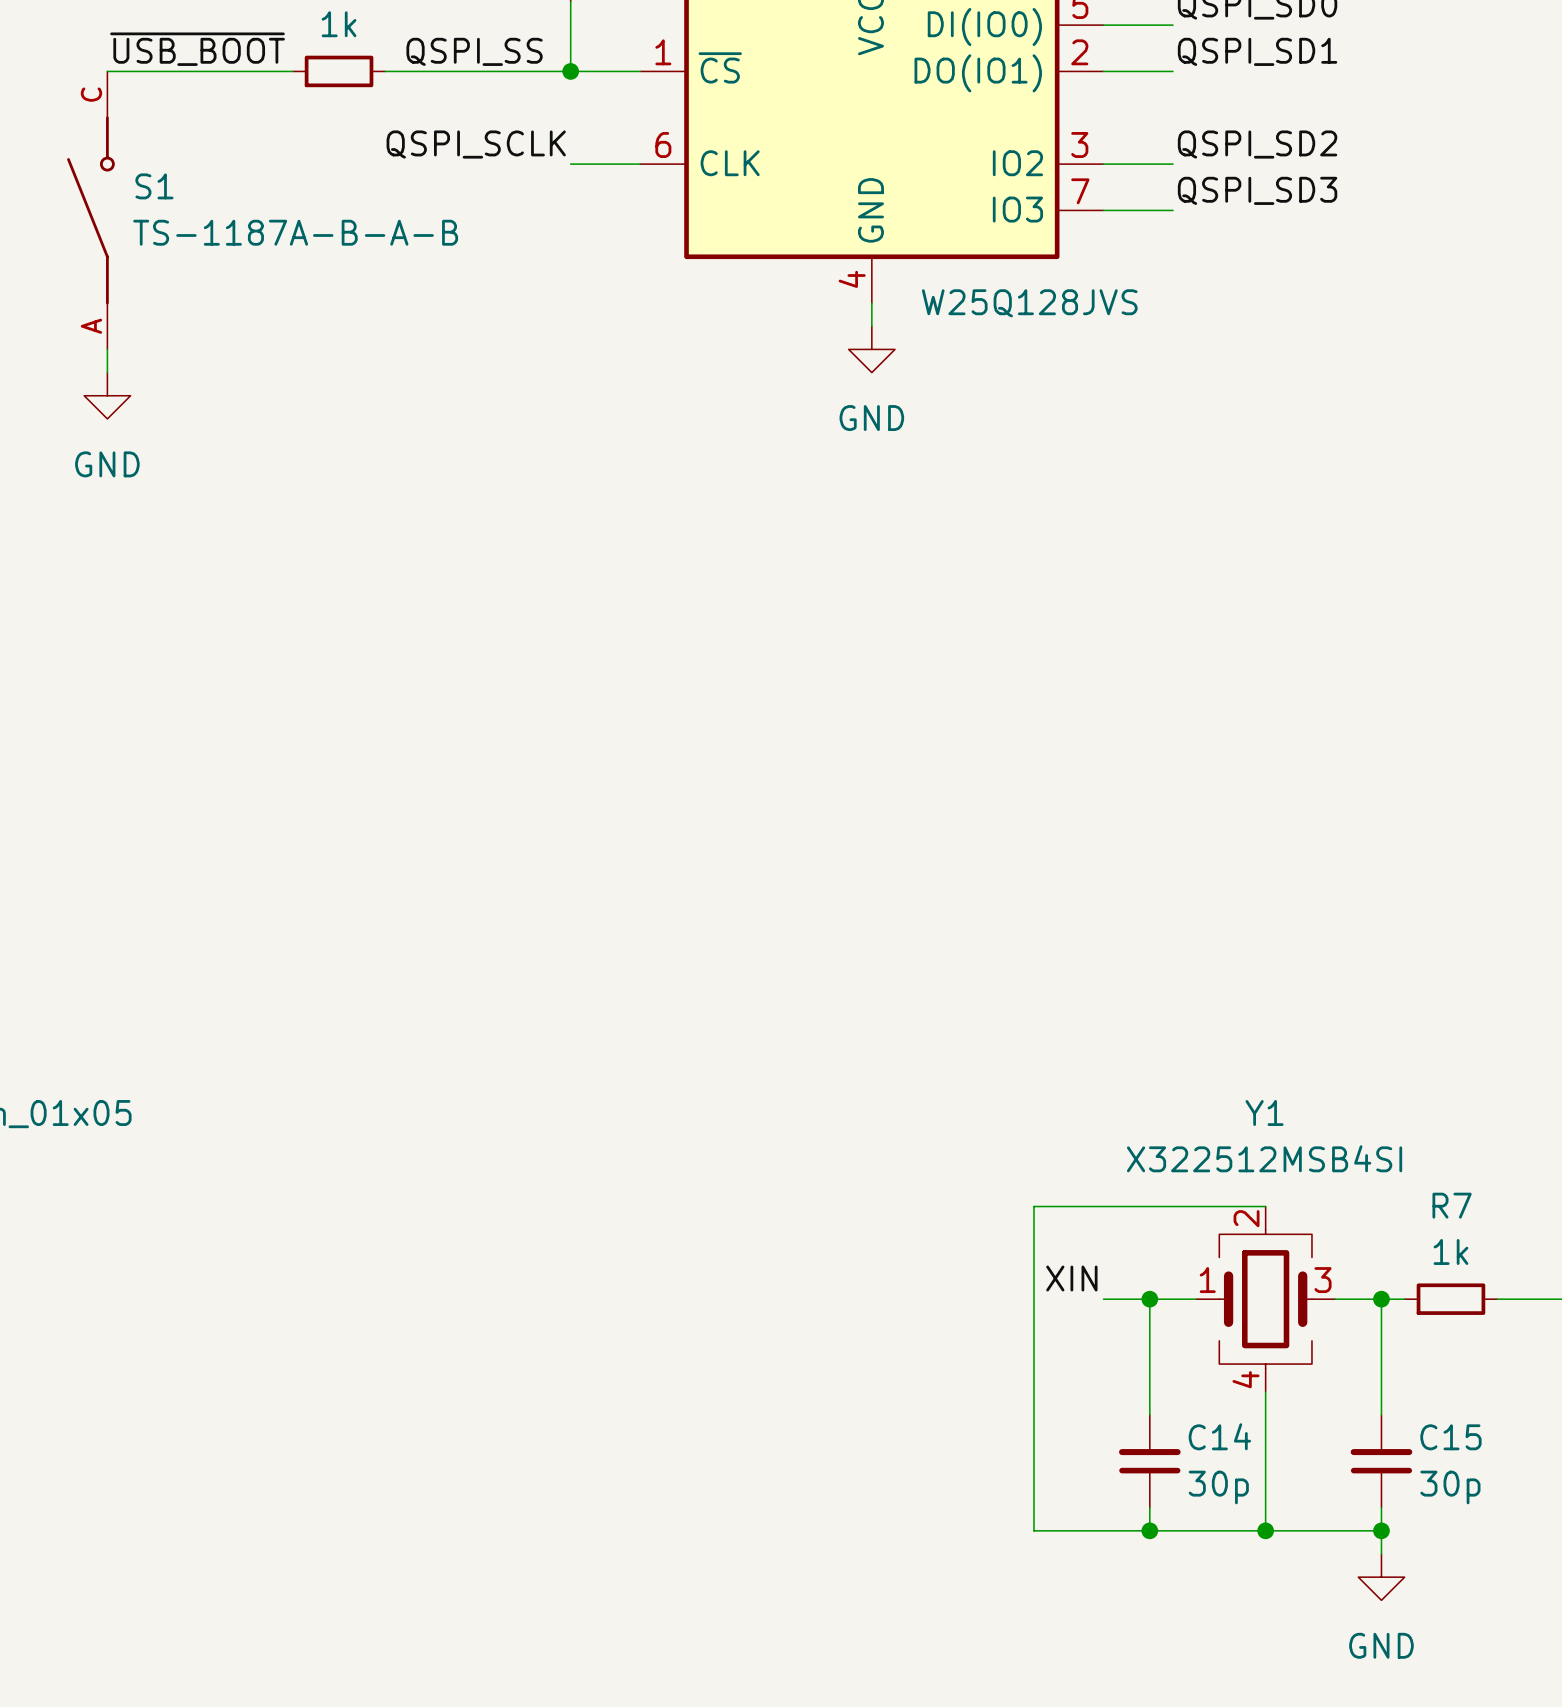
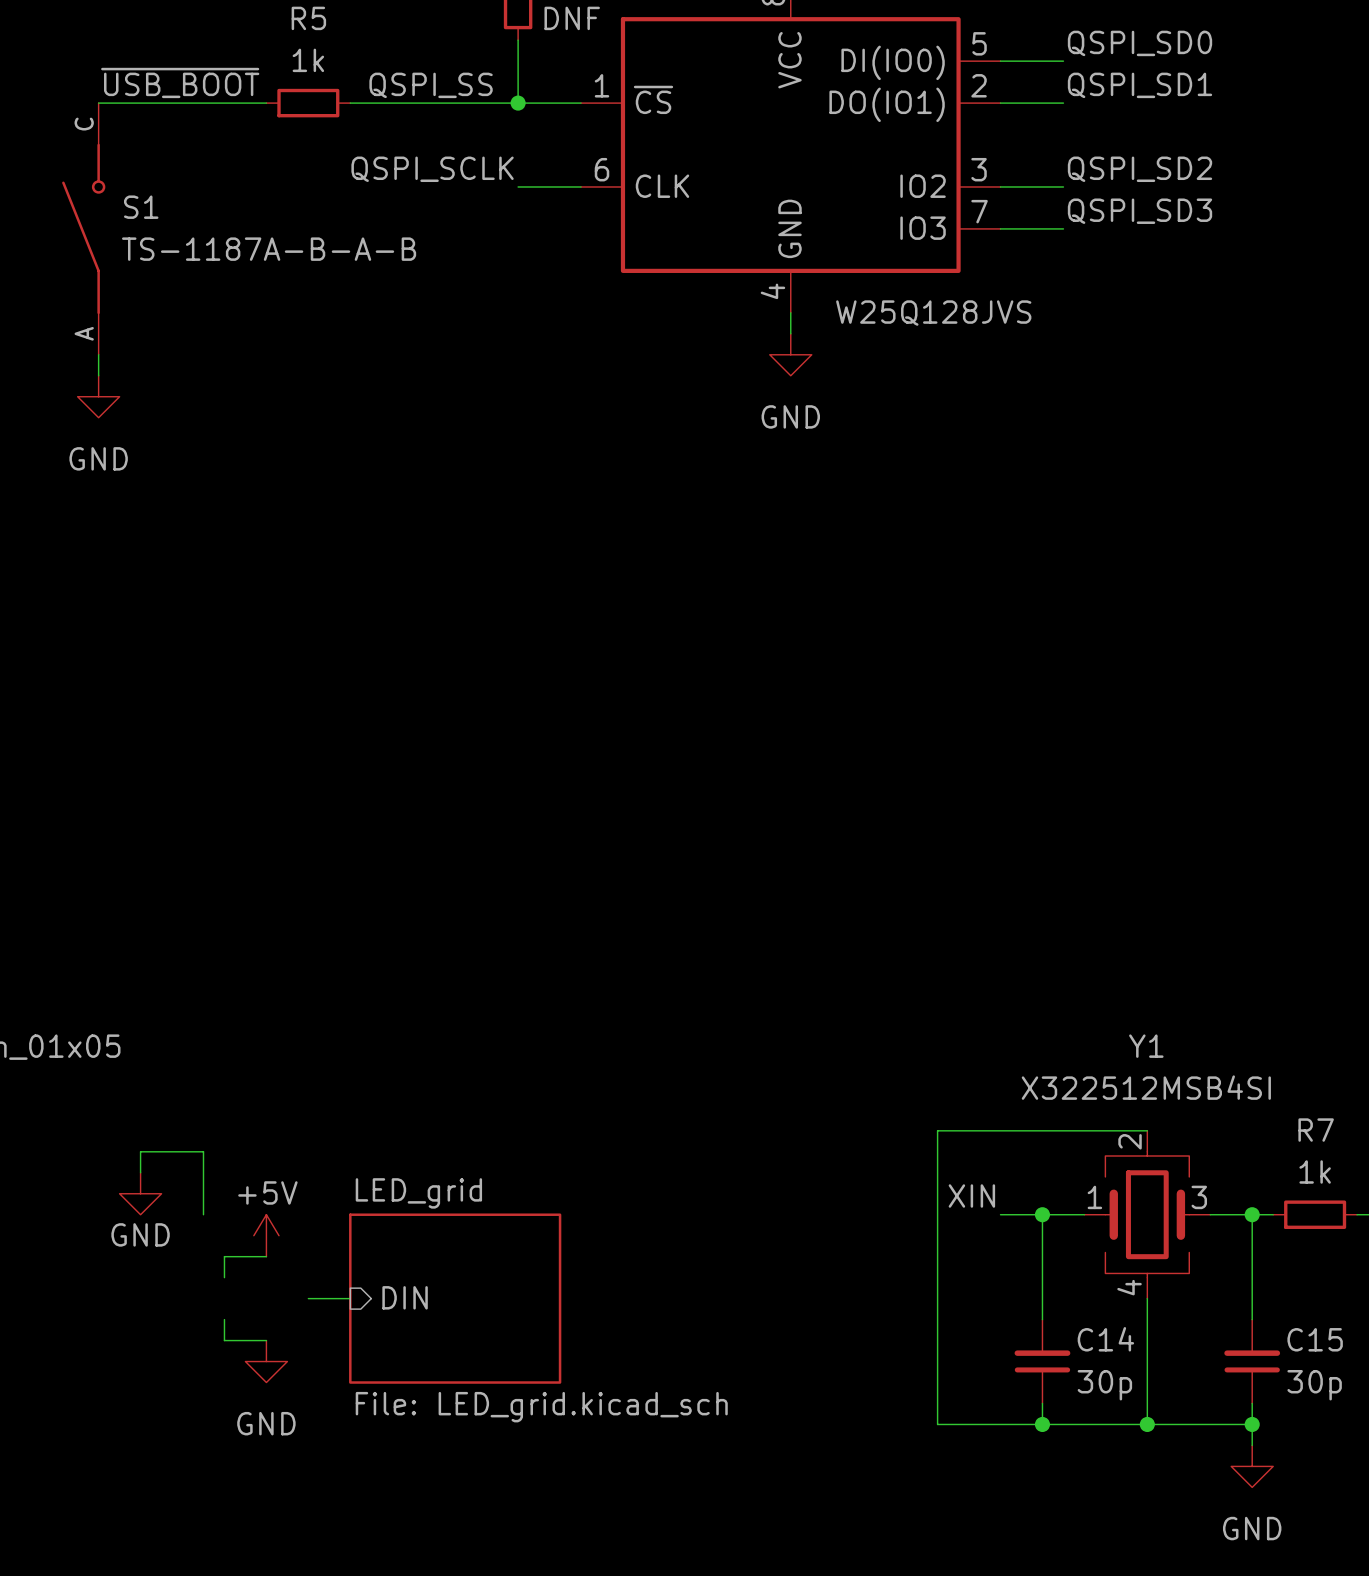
wire: none -> (140, 1172) (140, 1151) (203, 1151) (203, 1214)
power symbol: none -> GND (140, 1193)
power symbol: none -> +5V (266, 1235)
wire: none -> (266, 1256) (224, 1256) (224, 1277)
sheet pin: none -> DIN (405, 1297)
wire: none -> (308, 1298) (350, 1298)
sheet LED_grid: none -> File: LED_grid.kicad_sch (455, 1298)
wire: none -> (224, 1319) (224, 1340) (266, 1340)
power symbol: none -> GND (266, 1361)

